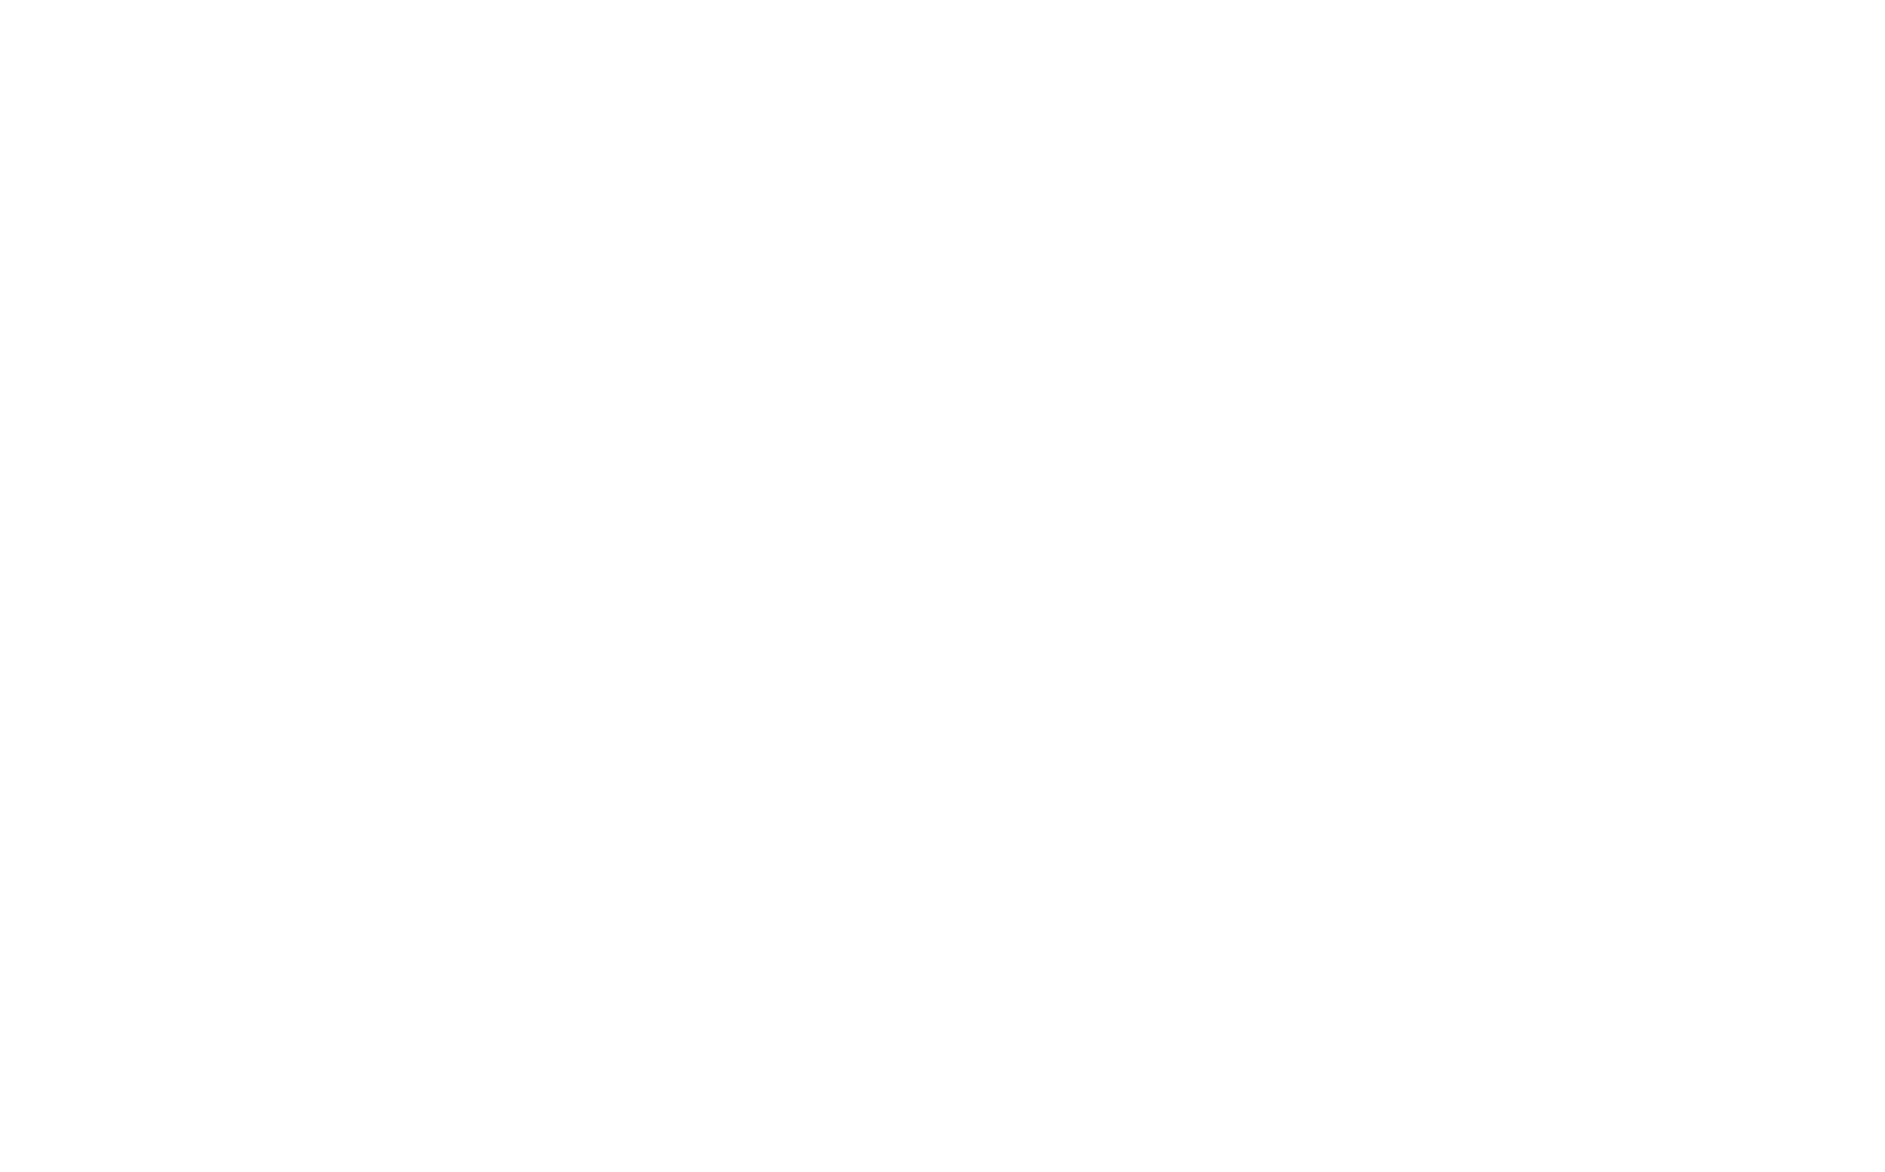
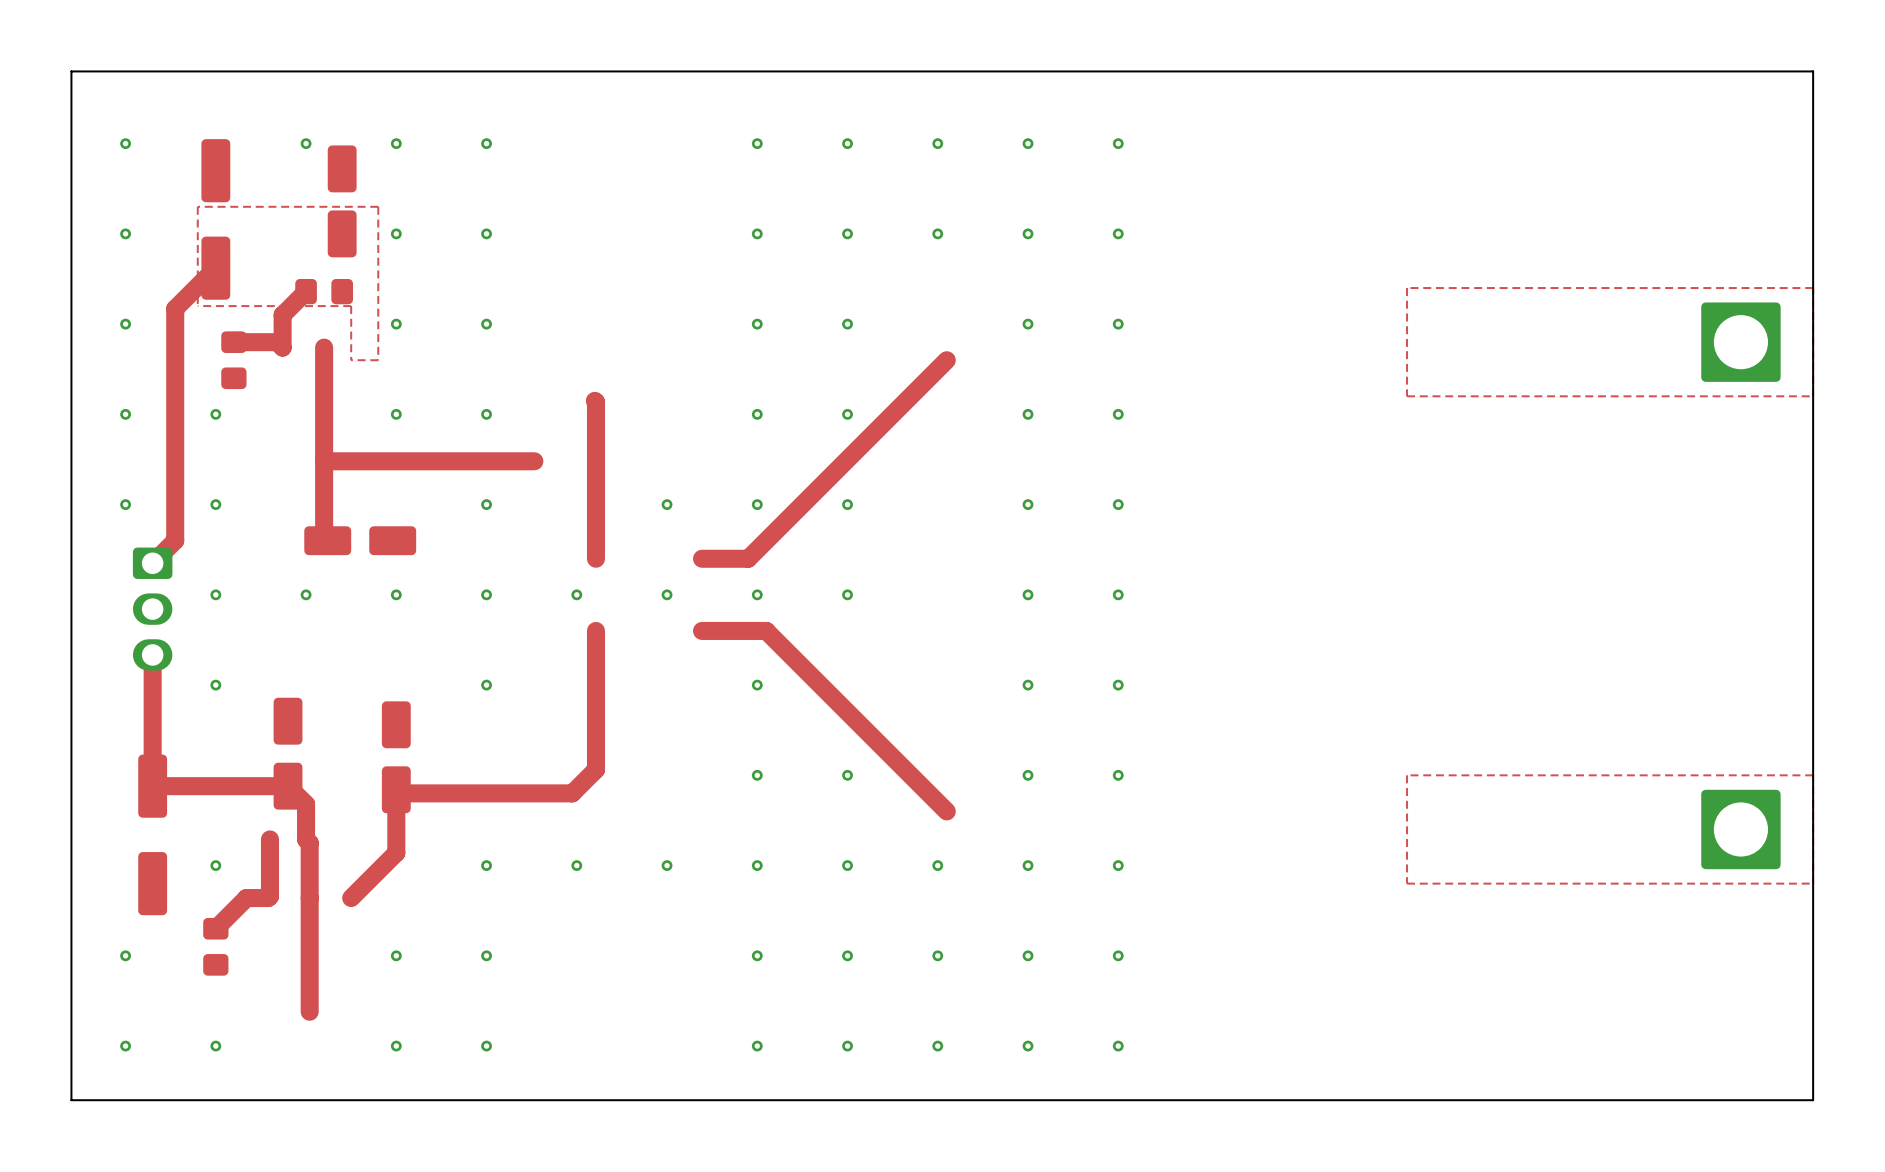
board edge: none -> (1813, 71) (71, 71) (71, 1100) (1813, 1100) (1813, 71)
via: none -> (125, 143)
via: none -> (306, 143)
via: none -> (396, 143)
via: none -> (486, 143)
via: none -> (757, 143)
via: none -> (847, 143)
via: none -> (937, 143)
via: none -> (1028, 143)
via: none -> (1118, 143)
part: none -> (342, 201)
top zone outline: none -> (378, 206) (197, 206) (197, 306) (351, 306) (351, 360) (378, 360) (378, 206)
part: none -> (215, 219)
via: none -> (125, 233)
via: none -> (396, 233)
via: none -> (486, 233)
via: none -> (757, 233)
via: none -> (847, 233)
via: none -> (937, 233)
via: none -> (1028, 233)
via: none -> (1118, 233)
top track: none -> (215, 268) (175, 308) (175, 540) (152, 563)
top zone outline: none -> (1813, 288) (1407, 288) (1407, 396) (1813, 396) (1813, 288)
top track: none -> (306, 291) (282, 315) (282, 347) (277, 342) (233, 342)
part: none -> (324, 291)
via: none -> (125, 324)
via: none -> (396, 324)
via: none -> (486, 324)
via: none -> (757, 324)
via: none -> (847, 324)
via: none -> (1028, 324)
via: none -> (1118, 324)
part: none -> (1740, 342)
top track: none -> (324, 347) (324, 540) (327, 540)
part: none -> (233, 360)
top track: none -> (946, 360) (748, 558) (702, 558)
top track: none -> (594, 400) (595, 558)
via: none -> (125, 414)
via: none -> (215, 414)
via: none -> (396, 414)
via: none -> (486, 414)
via: none -> (757, 414)
via: none -> (847, 414)
via: none -> (1028, 414)
via: none -> (1118, 414)
top track: none -> (534, 461) (324, 461)
via: none -> (125, 504)
via: none -> (215, 504)
via: none -> (486, 504)
via: none -> (667, 504)
via: none -> (757, 504)
via: none -> (847, 504)
via: none -> (1028, 504)
via: none -> (1118, 504)
part: none -> (360, 540)
via: none -> (215, 594)
via: none -> (306, 594)
via: none -> (396, 594)
via: none -> (486, 594)
via: none -> (576, 594)
via: none -> (667, 594)
via: none -> (757, 594)
via: none -> (847, 594)
via: none -> (1028, 594)
via: none -> (1118, 594)
part: none -> (152, 609)
top track: none -> (595, 630) (595, 769) (572, 793) (399, 793) (396, 789) (396, 852) (351, 898)
top track: none -> (702, 630) (766, 630) (946, 811)
top track: none -> (152, 654) (152, 775)
via: none -> (215, 685)
via: none -> (486, 685)
via: none -> (757, 685)
via: none -> (1028, 685)
via: none -> (1118, 685)
part: none -> (288, 753)
part: none -> (396, 757)
via: none -> (757, 775)
via: none -> (847, 775)
via: none -> (1028, 775)
via: none -> (1118, 775)
top zone outline: none -> (1813, 775) (1813, 883) (1407, 883) (1407, 775) (1813, 775)
top track: none -> (152, 786) (288, 786) (306, 804) (306, 839) (309, 843) (309, 1011)
part: none -> (1740, 829)
part: none -> (152, 834)
top track: none -> (269, 839) (269, 896) (268, 898) (246, 898) (215, 928)
via: none -> (215, 865)
via: none -> (486, 865)
via: none -> (576, 865)
via: none -> (667, 865)
via: none -> (757, 865)
via: none -> (847, 865)
via: none -> (937, 865)
via: none -> (1028, 865)
via: none -> (1118, 865)
part: none -> (215, 946)
via: none -> (125, 955)
via: none -> (396, 955)
via: none -> (486, 955)
via: none -> (757, 955)
via: none -> (847, 955)
via: none -> (937, 955)
via: none -> (1028, 955)
via: none -> (1118, 955)
via: none -> (125, 1046)
via: none -> (215, 1046)
via: none -> (396, 1046)
via: none -> (486, 1046)
via: none -> (757, 1046)
via: none -> (847, 1046)
via: none -> (937, 1046)
via: none -> (1028, 1046)
via: none -> (1118, 1046)

